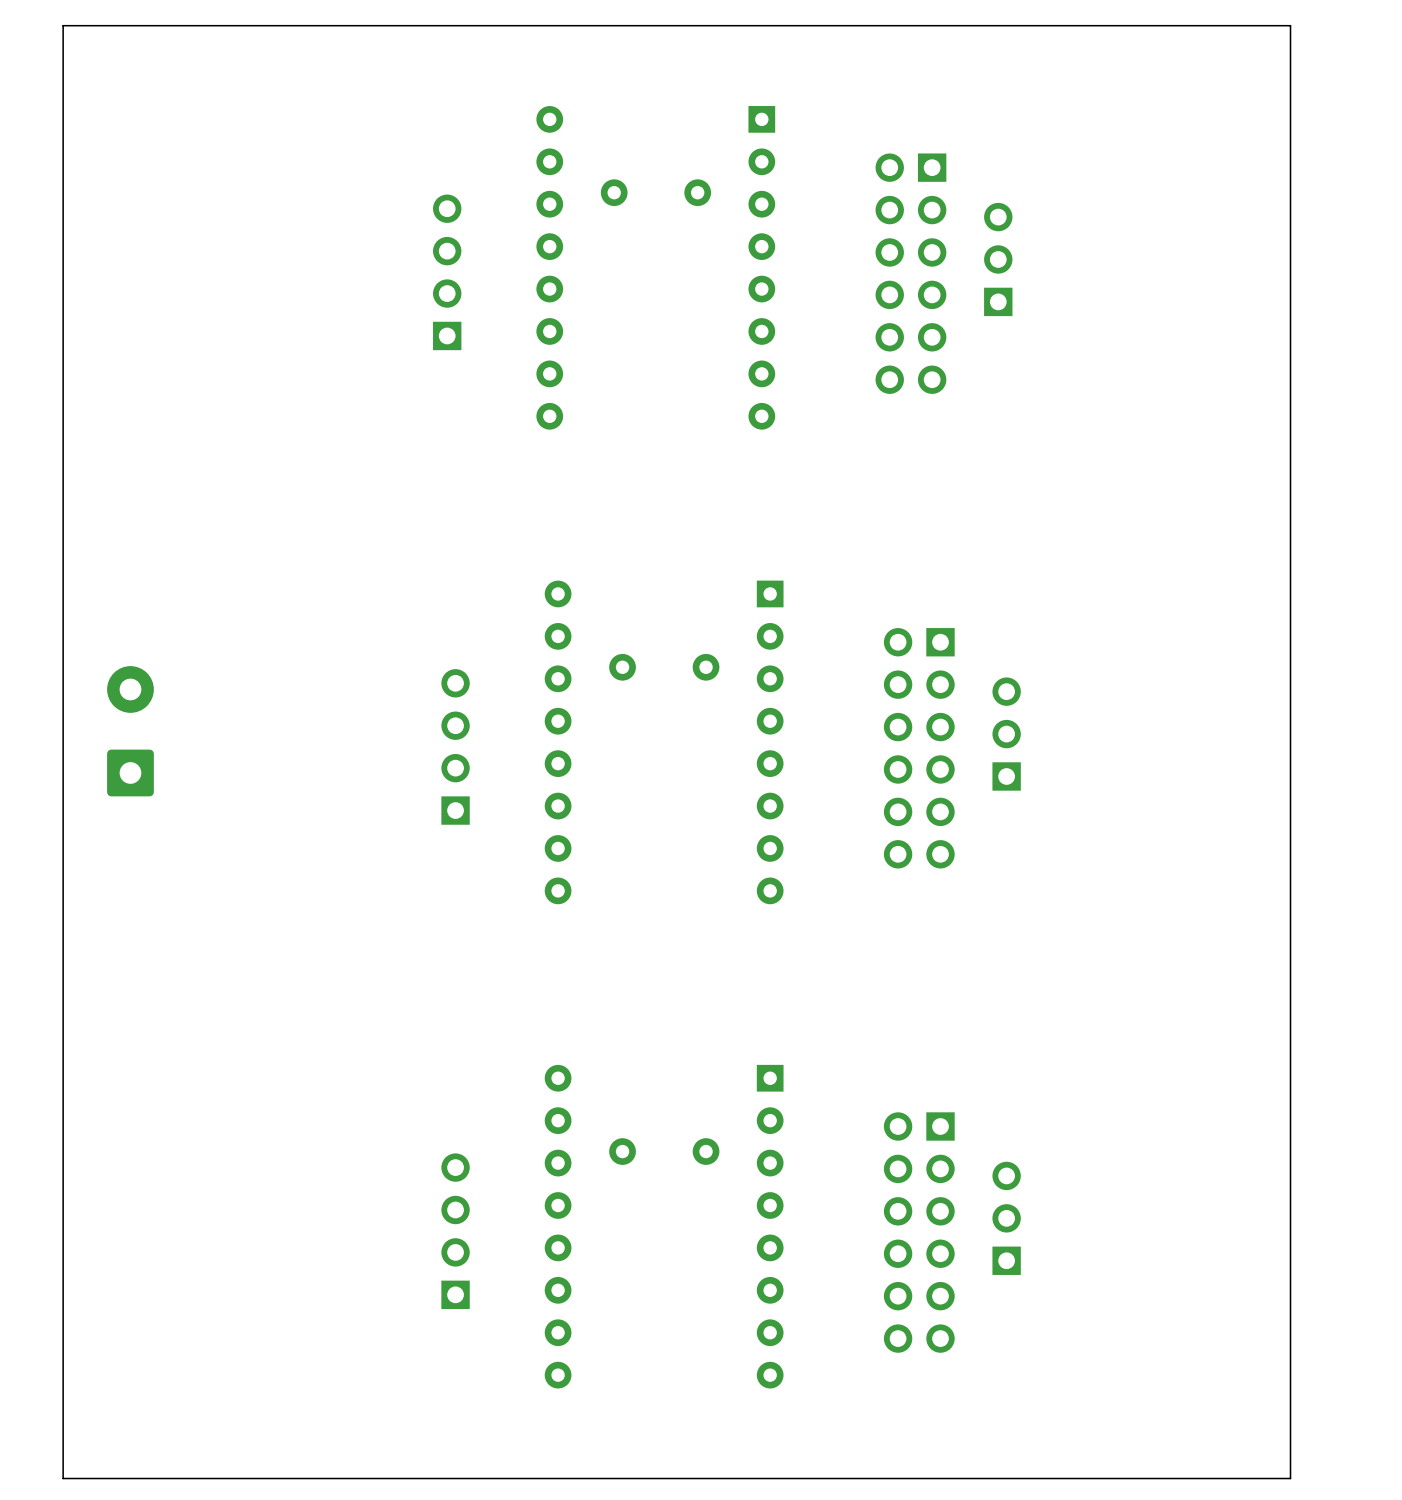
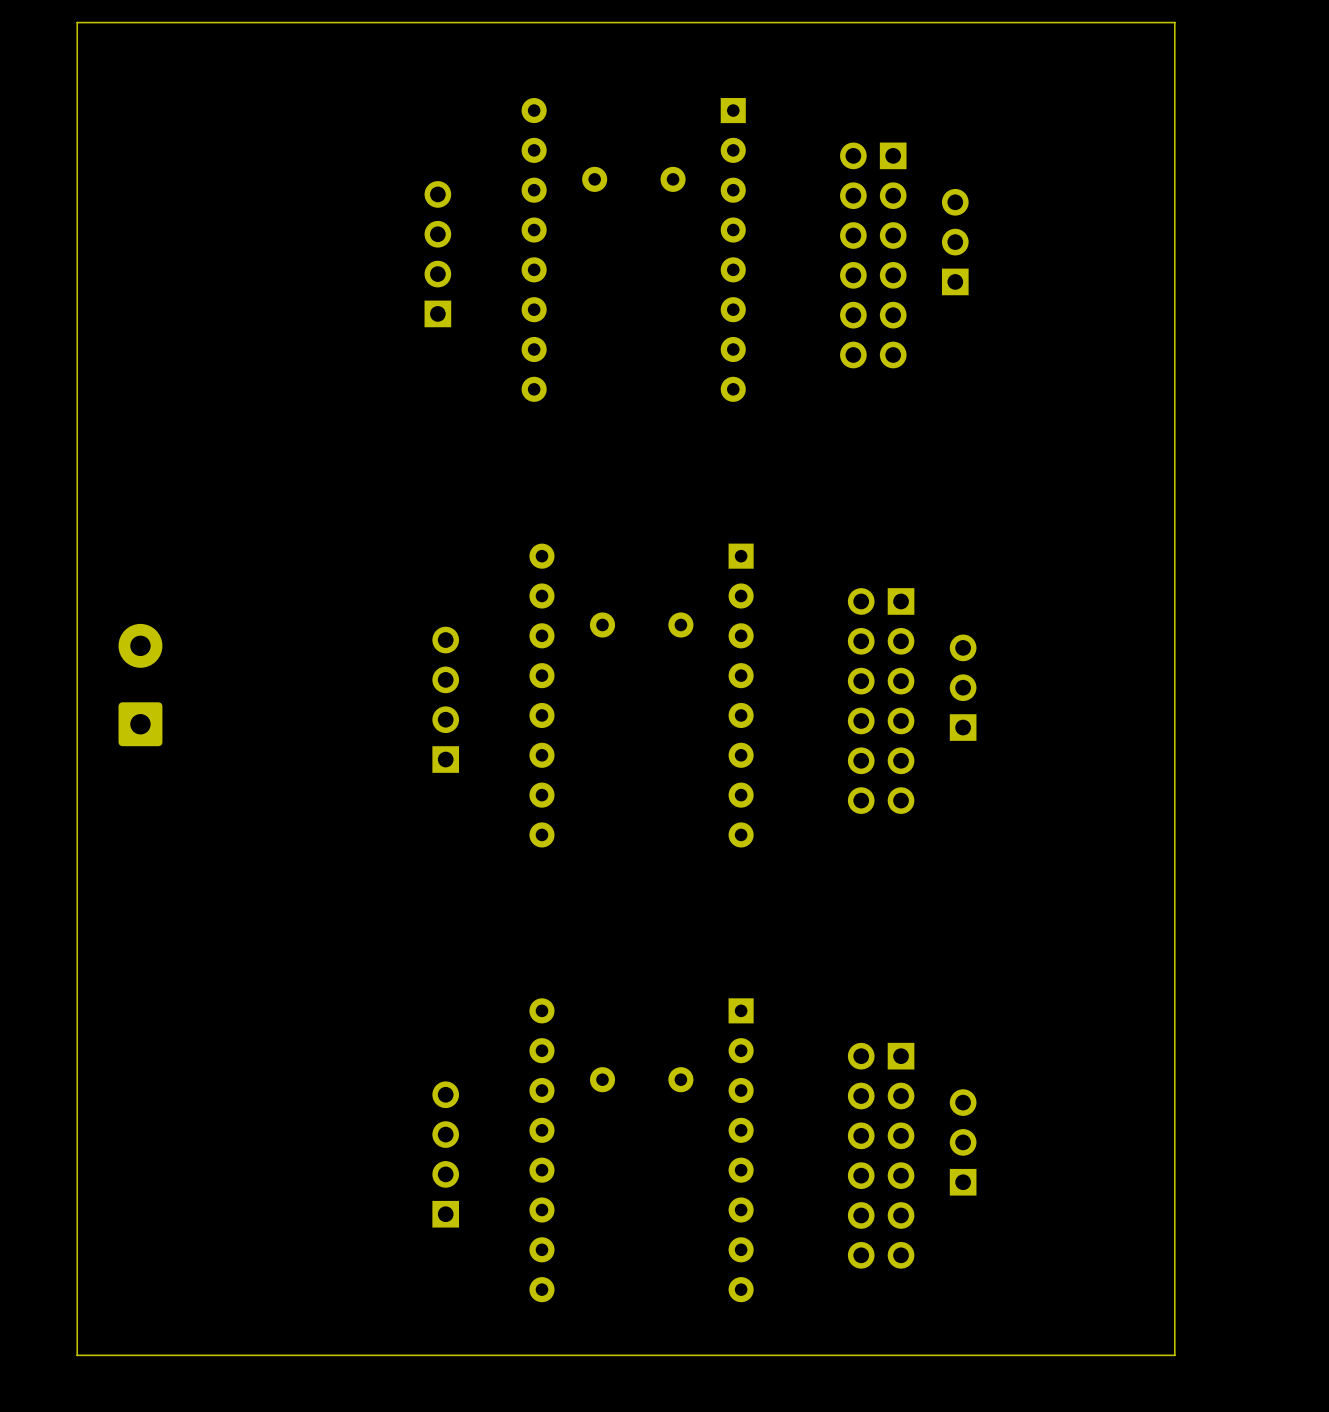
board edge: (1232, 25) (1290, 25) (1290, 1478) (63, 1478) (63, 1445) -> (1174, 22) (1174, 1355) (77, 1355)

